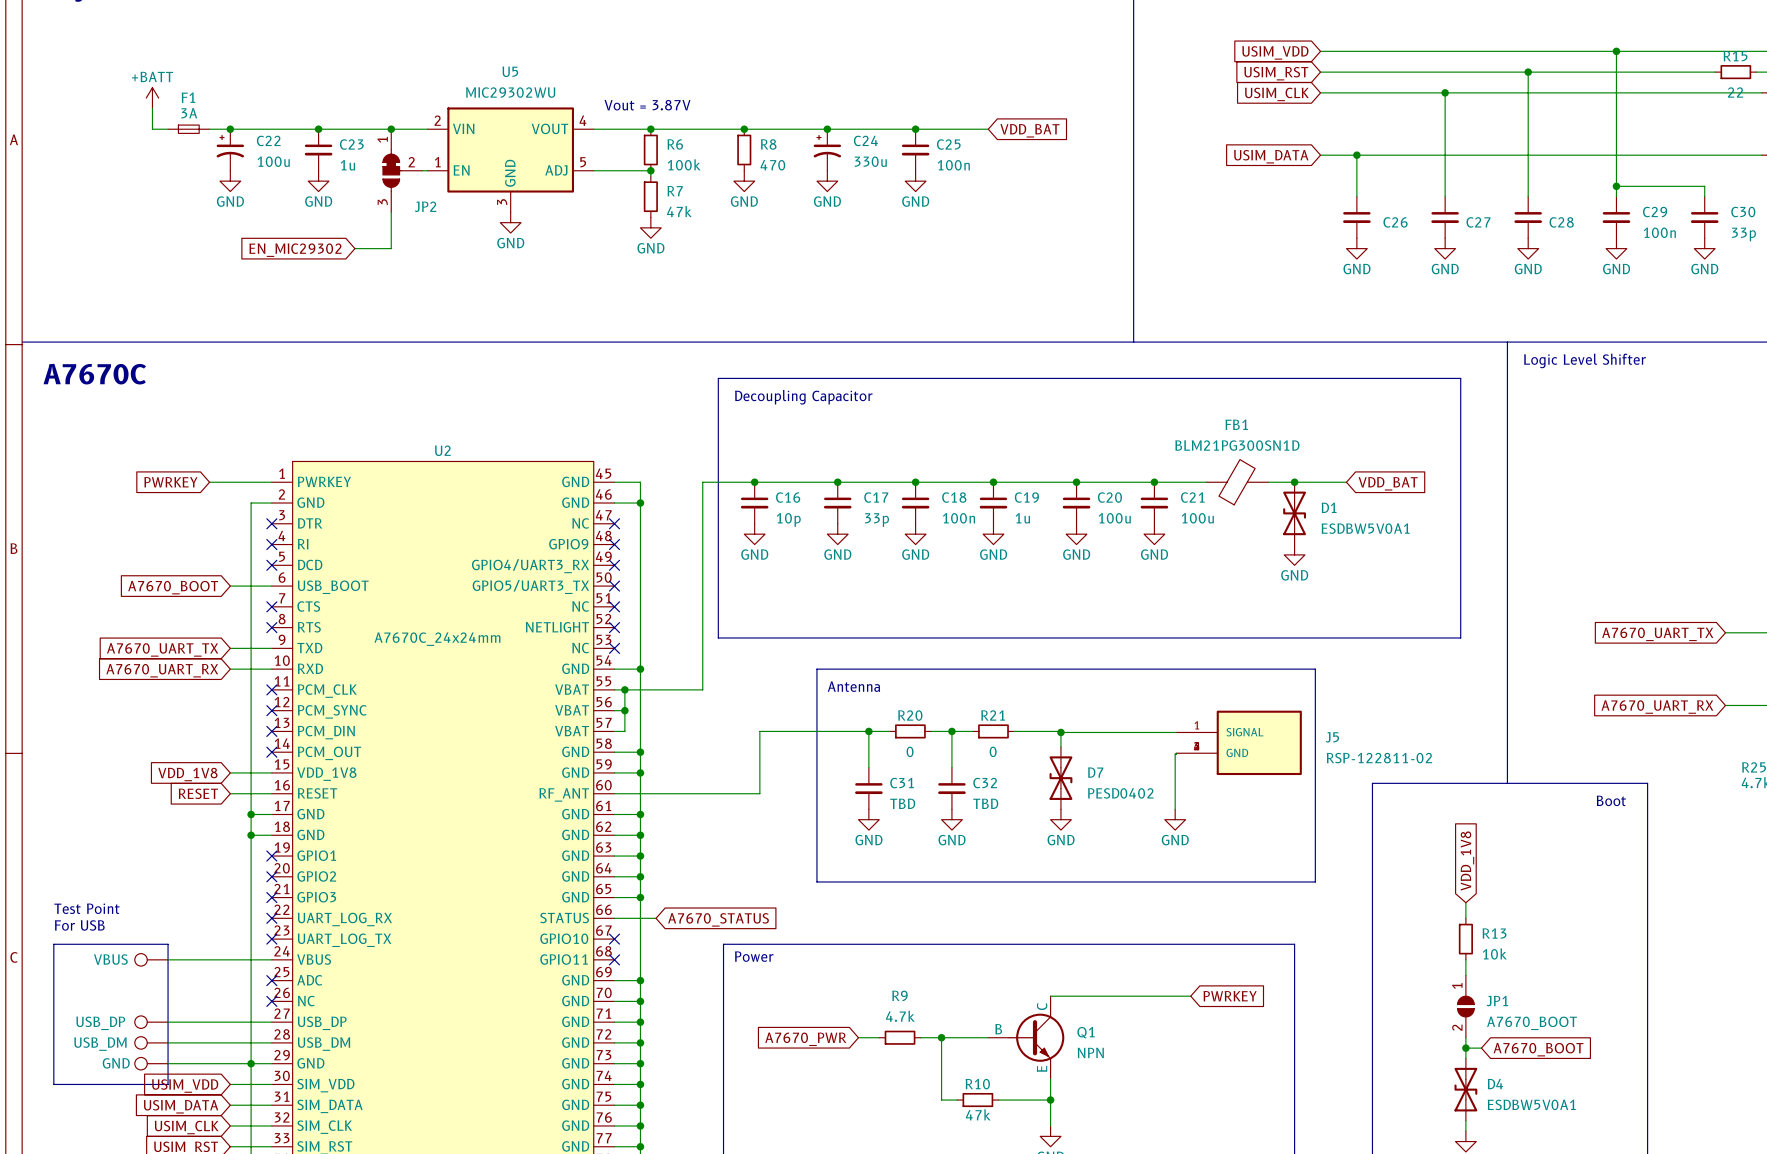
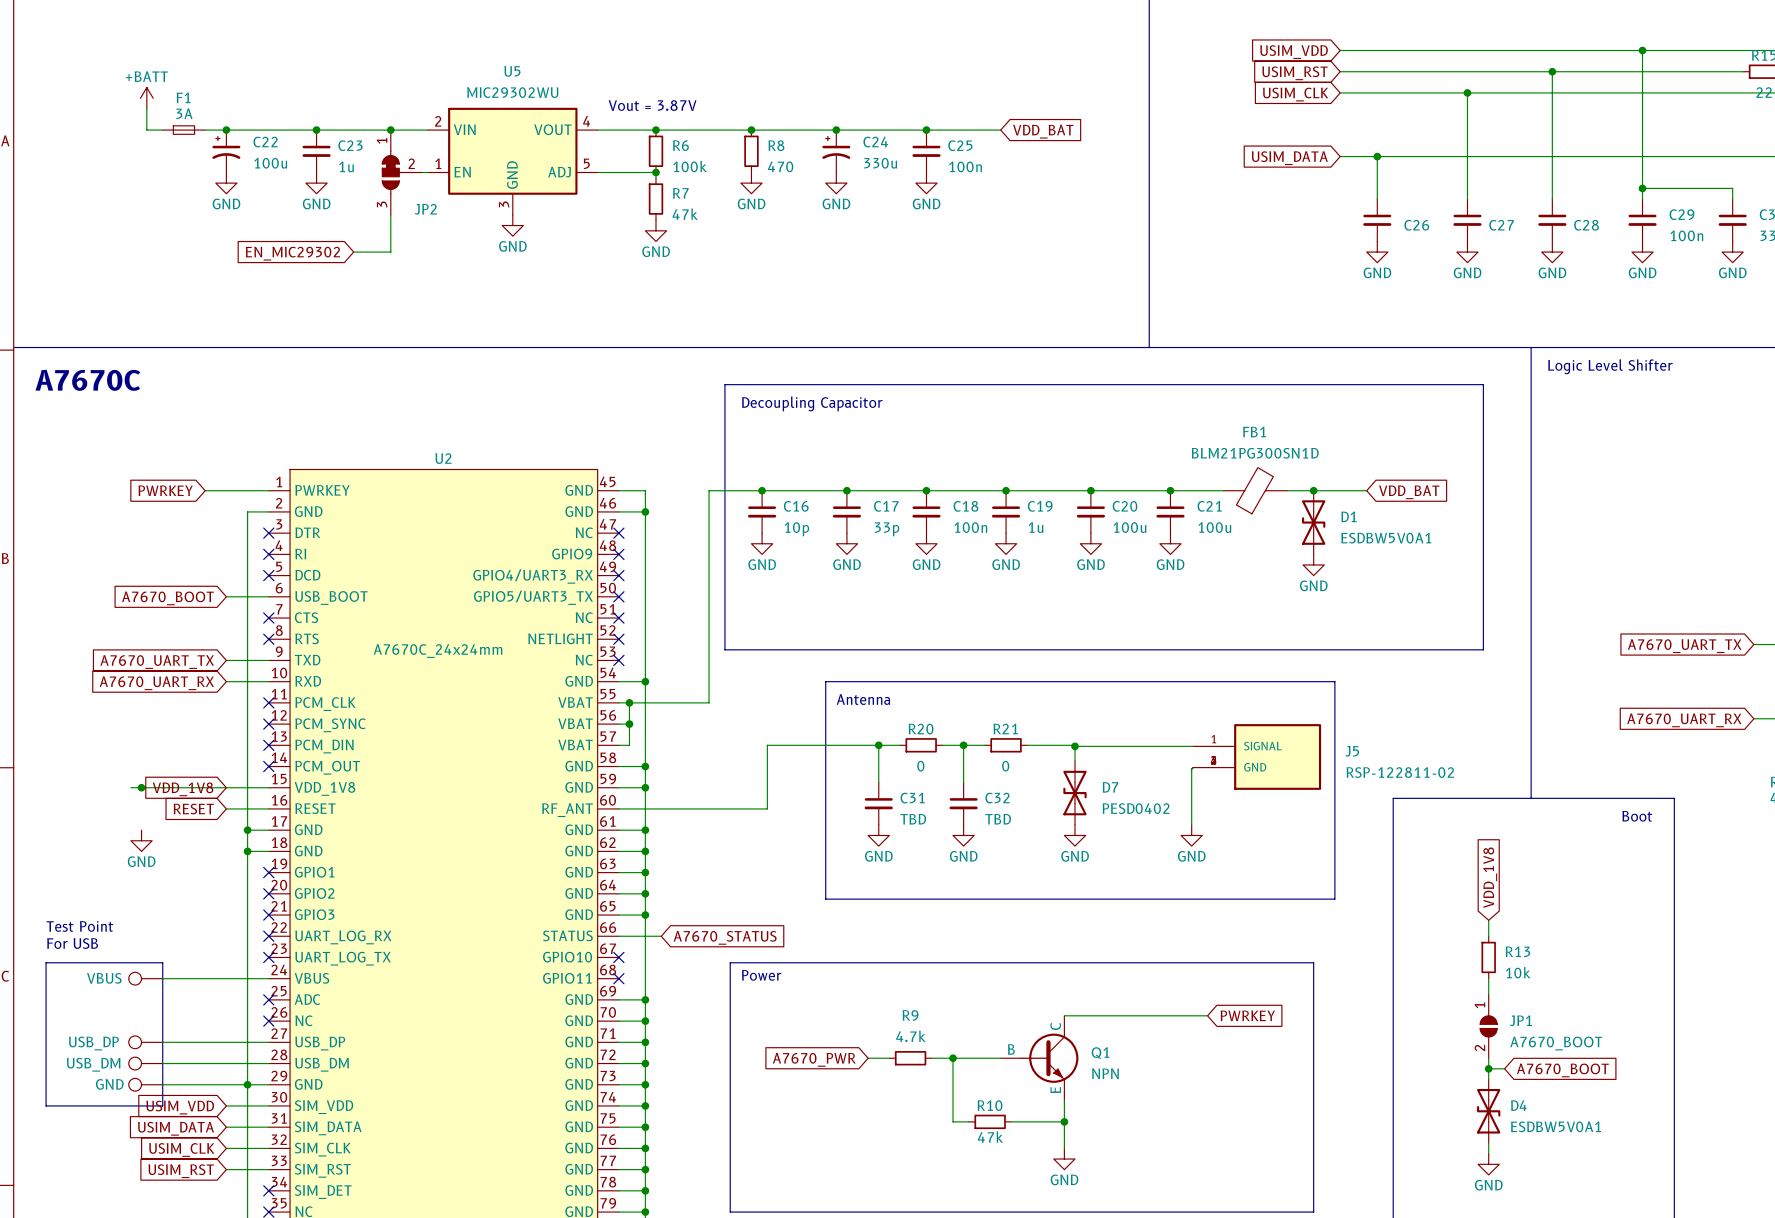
wire: none -> (130, 787) (226, 787)
junction: none -> (141, 787)
power symbol: none -> GND (141, 840)

